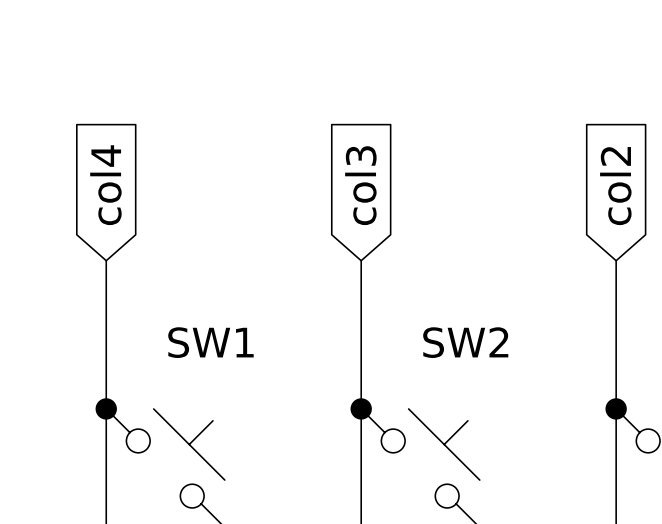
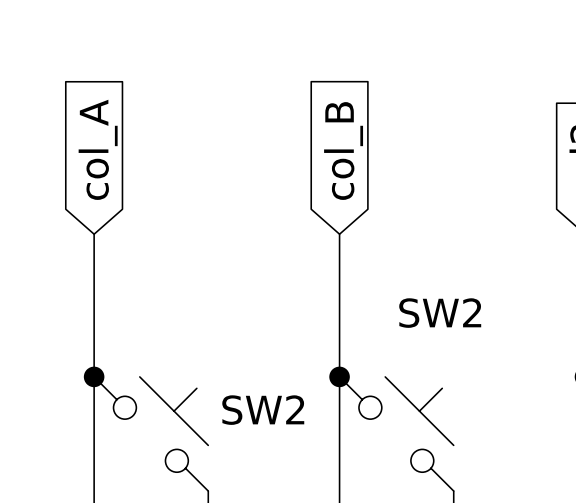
global label: col4 (105, 185) -> col_A (98, 149)
global label: col3 (360, 185) -> col_B (343, 151)
SW1 name: SW1 (210, 342) -> SW2 (263, 410)

